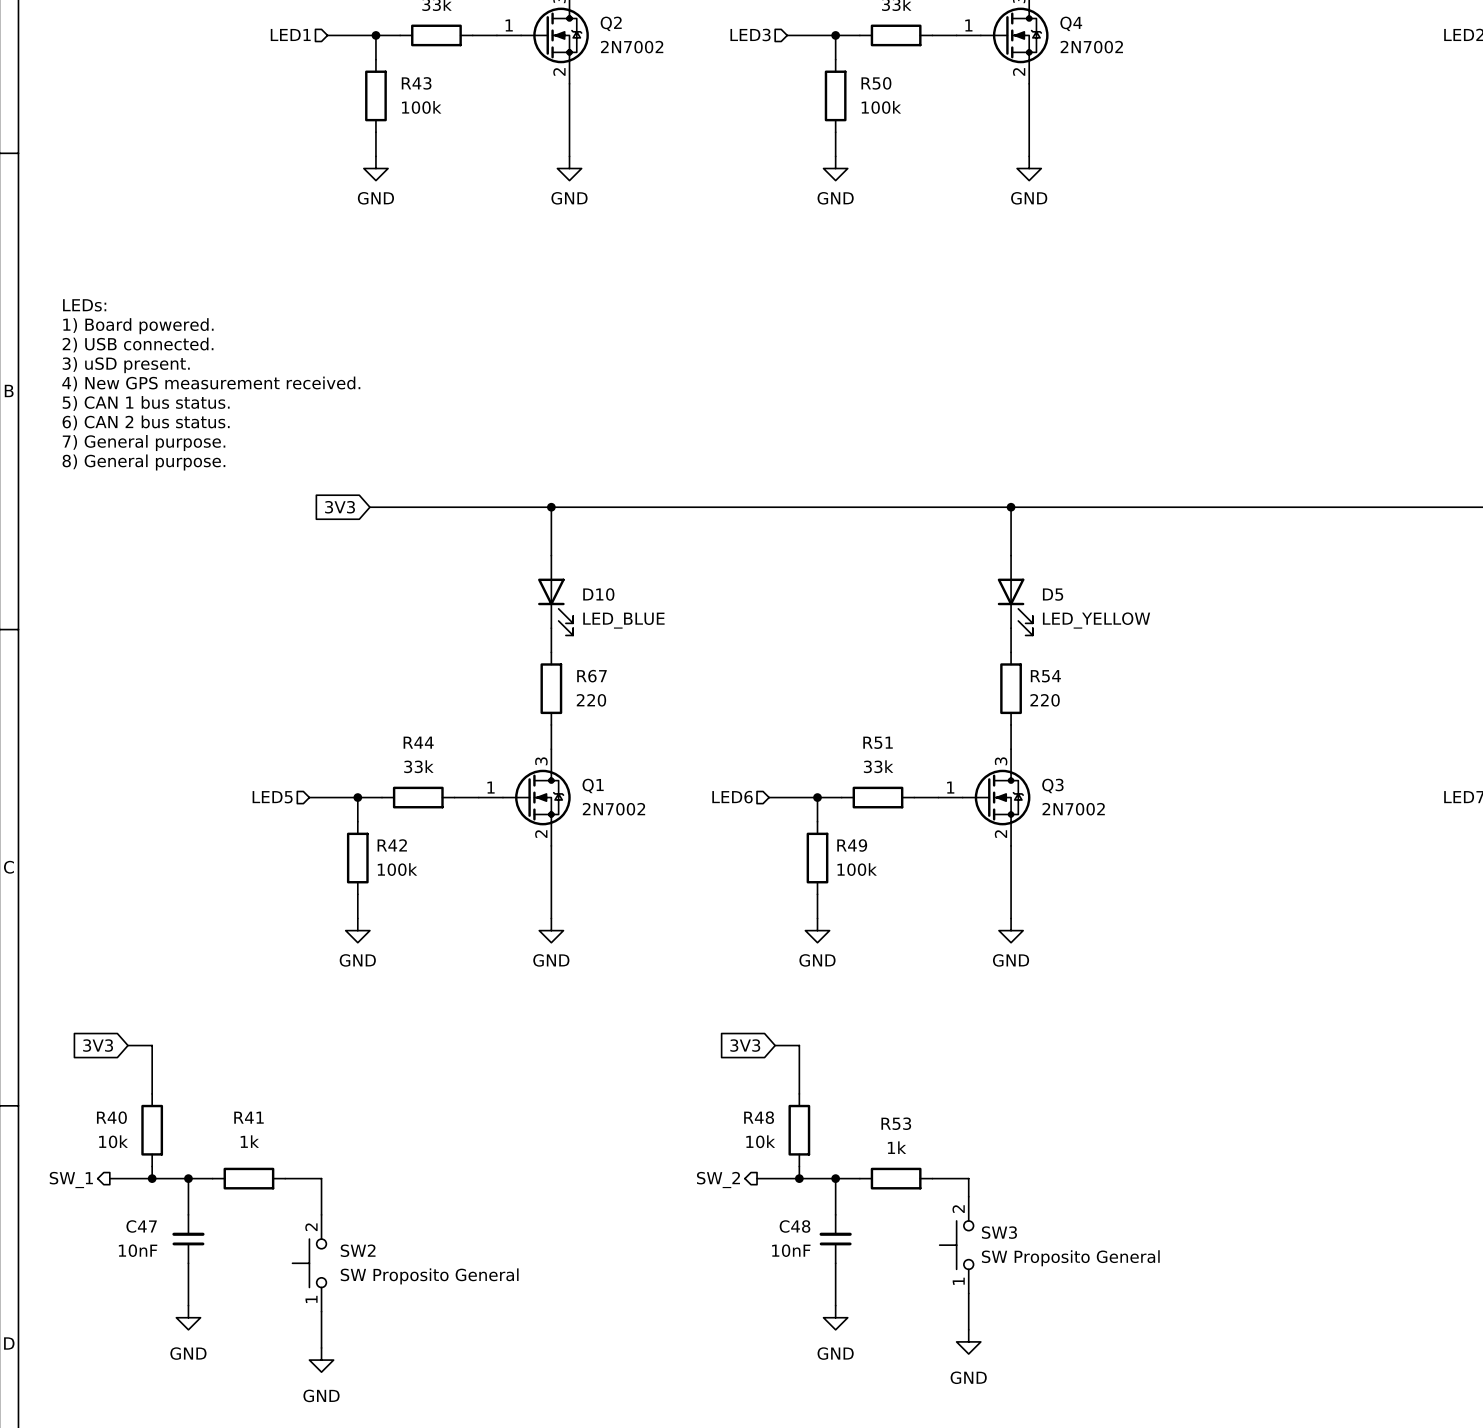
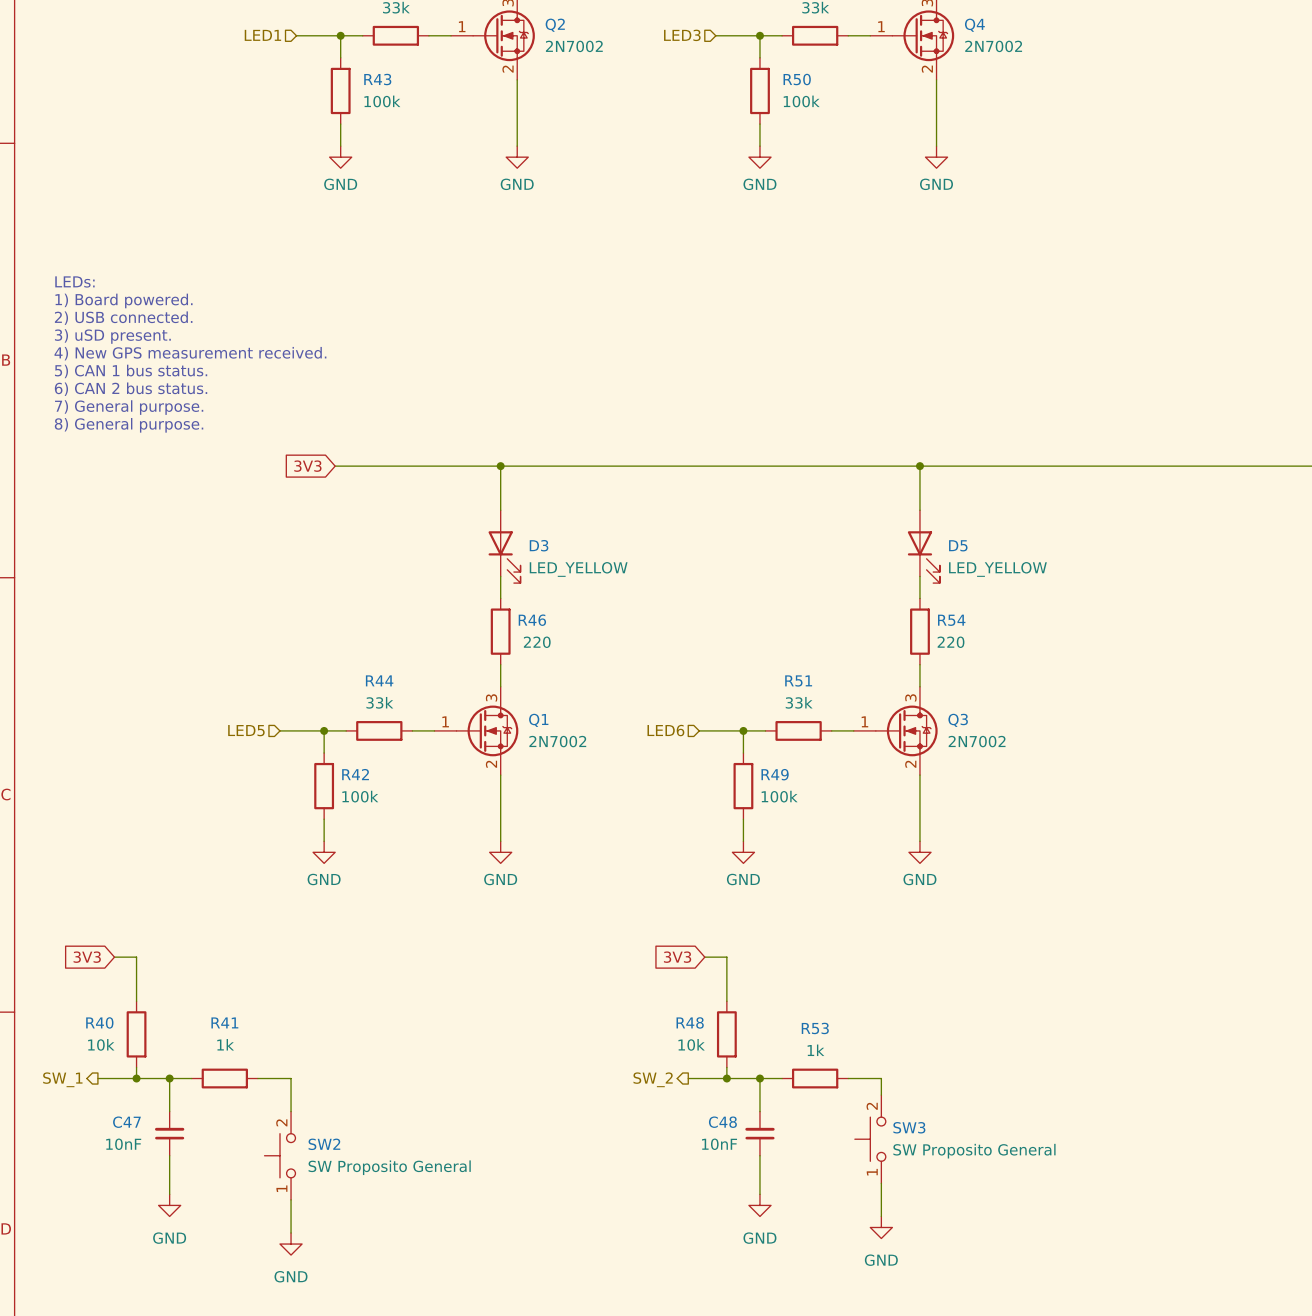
D10 name: D10 (598, 594) -> D3 (539, 545)
D10 value: LED_BLUE (623, 620) -> LED_YELLOW (578, 569)
R67 name: R67 (591, 676) -> R46 (532, 620)

